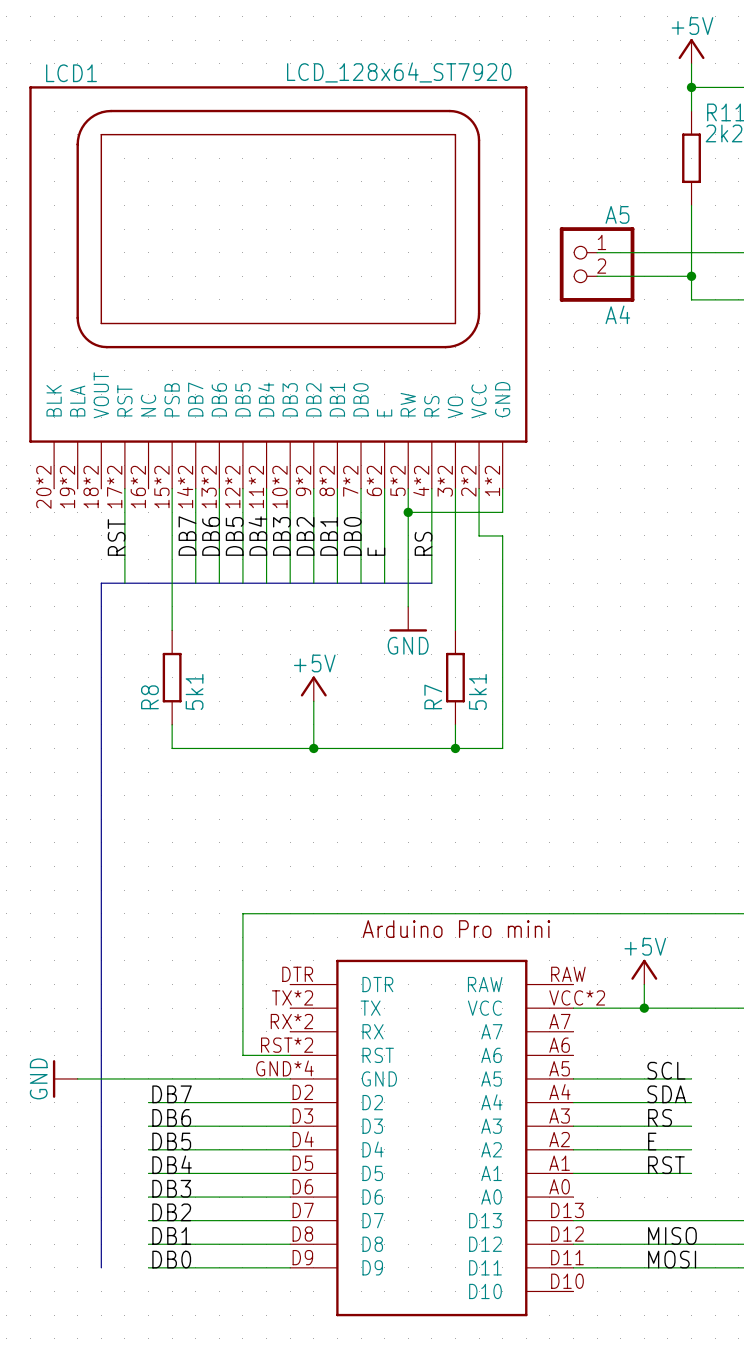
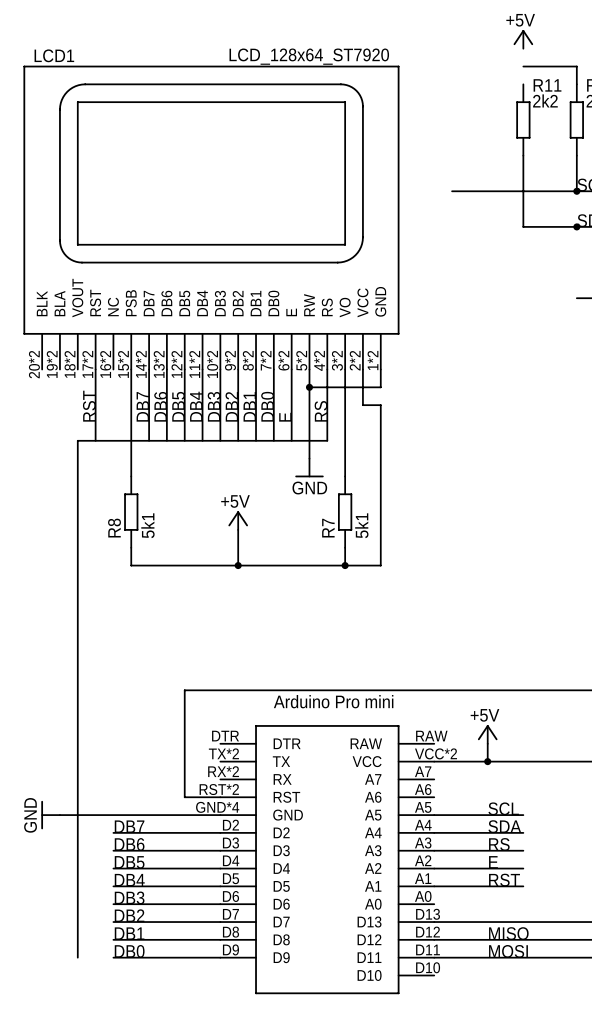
wire: (691, 63) (691, 111) -> none
junction: (691, 87) -> none
A5: A4 (597, 264) -> none
wire: (597, 276) (691, 276) -> none
junction: (691, 276) -> none

